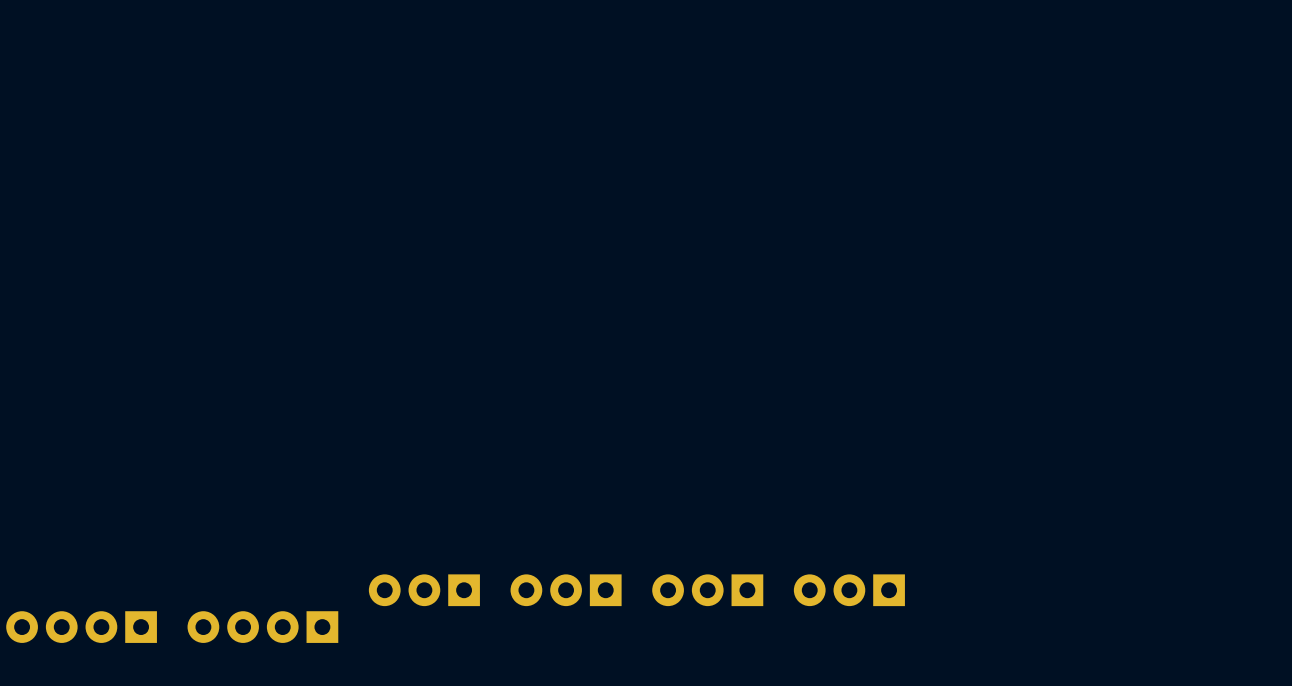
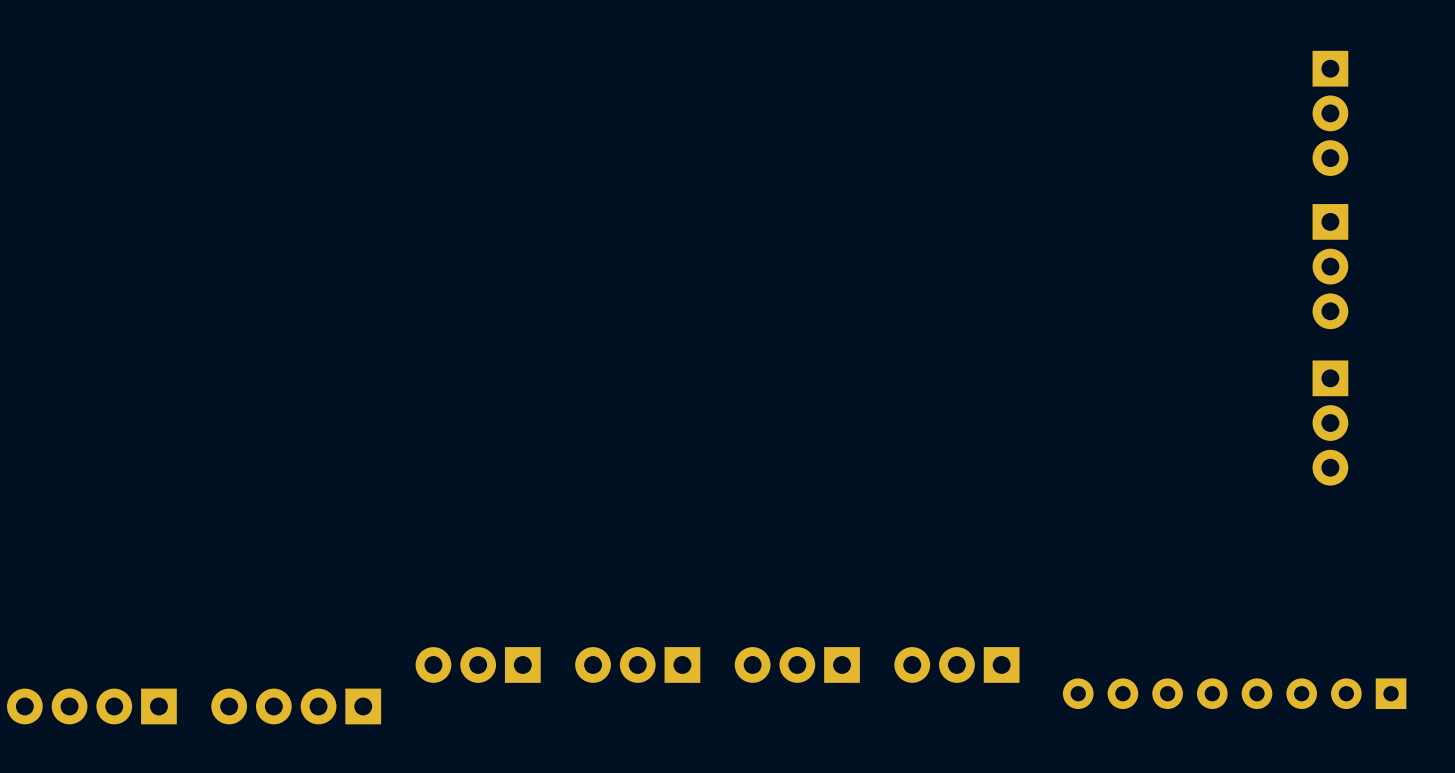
part: none -> (1330, 113)
part: none -> (1330, 266)
part: none -> (1330, 423)
part: none -> (1234, 693)

